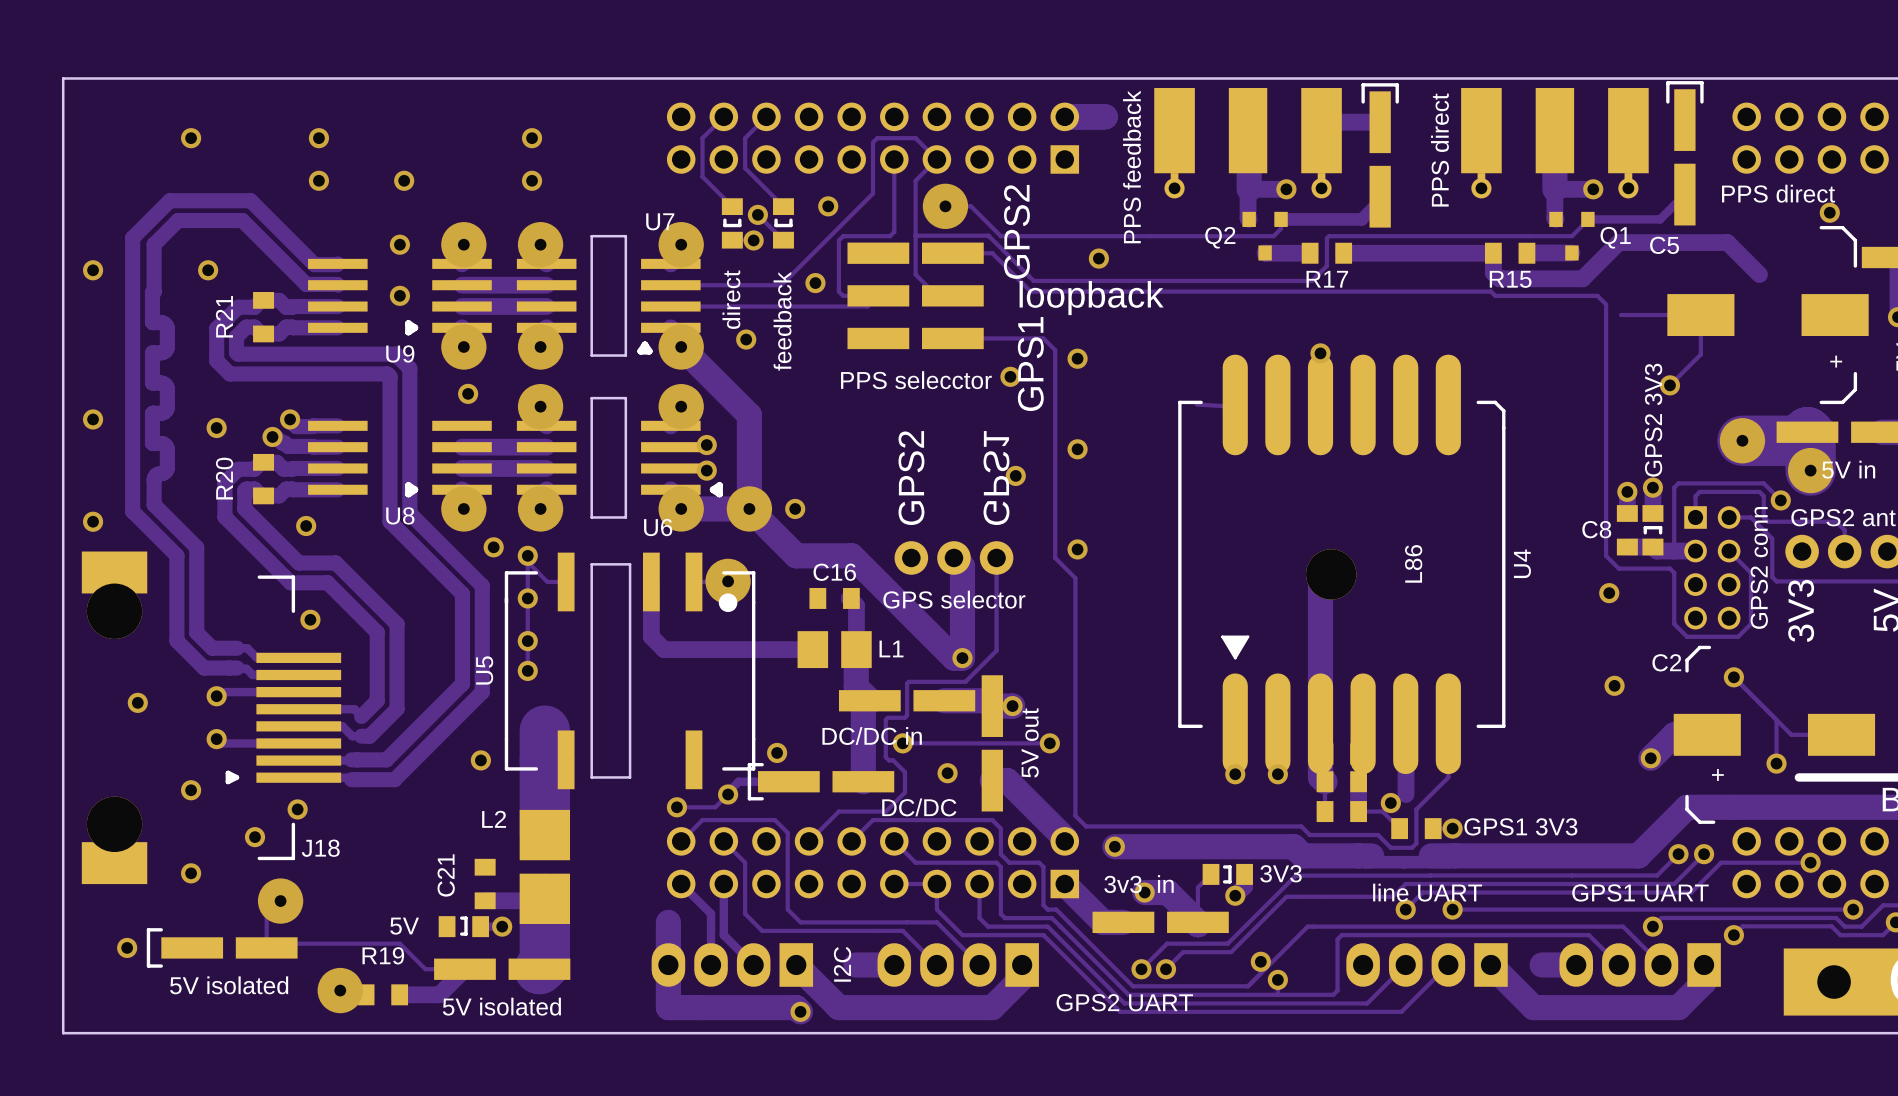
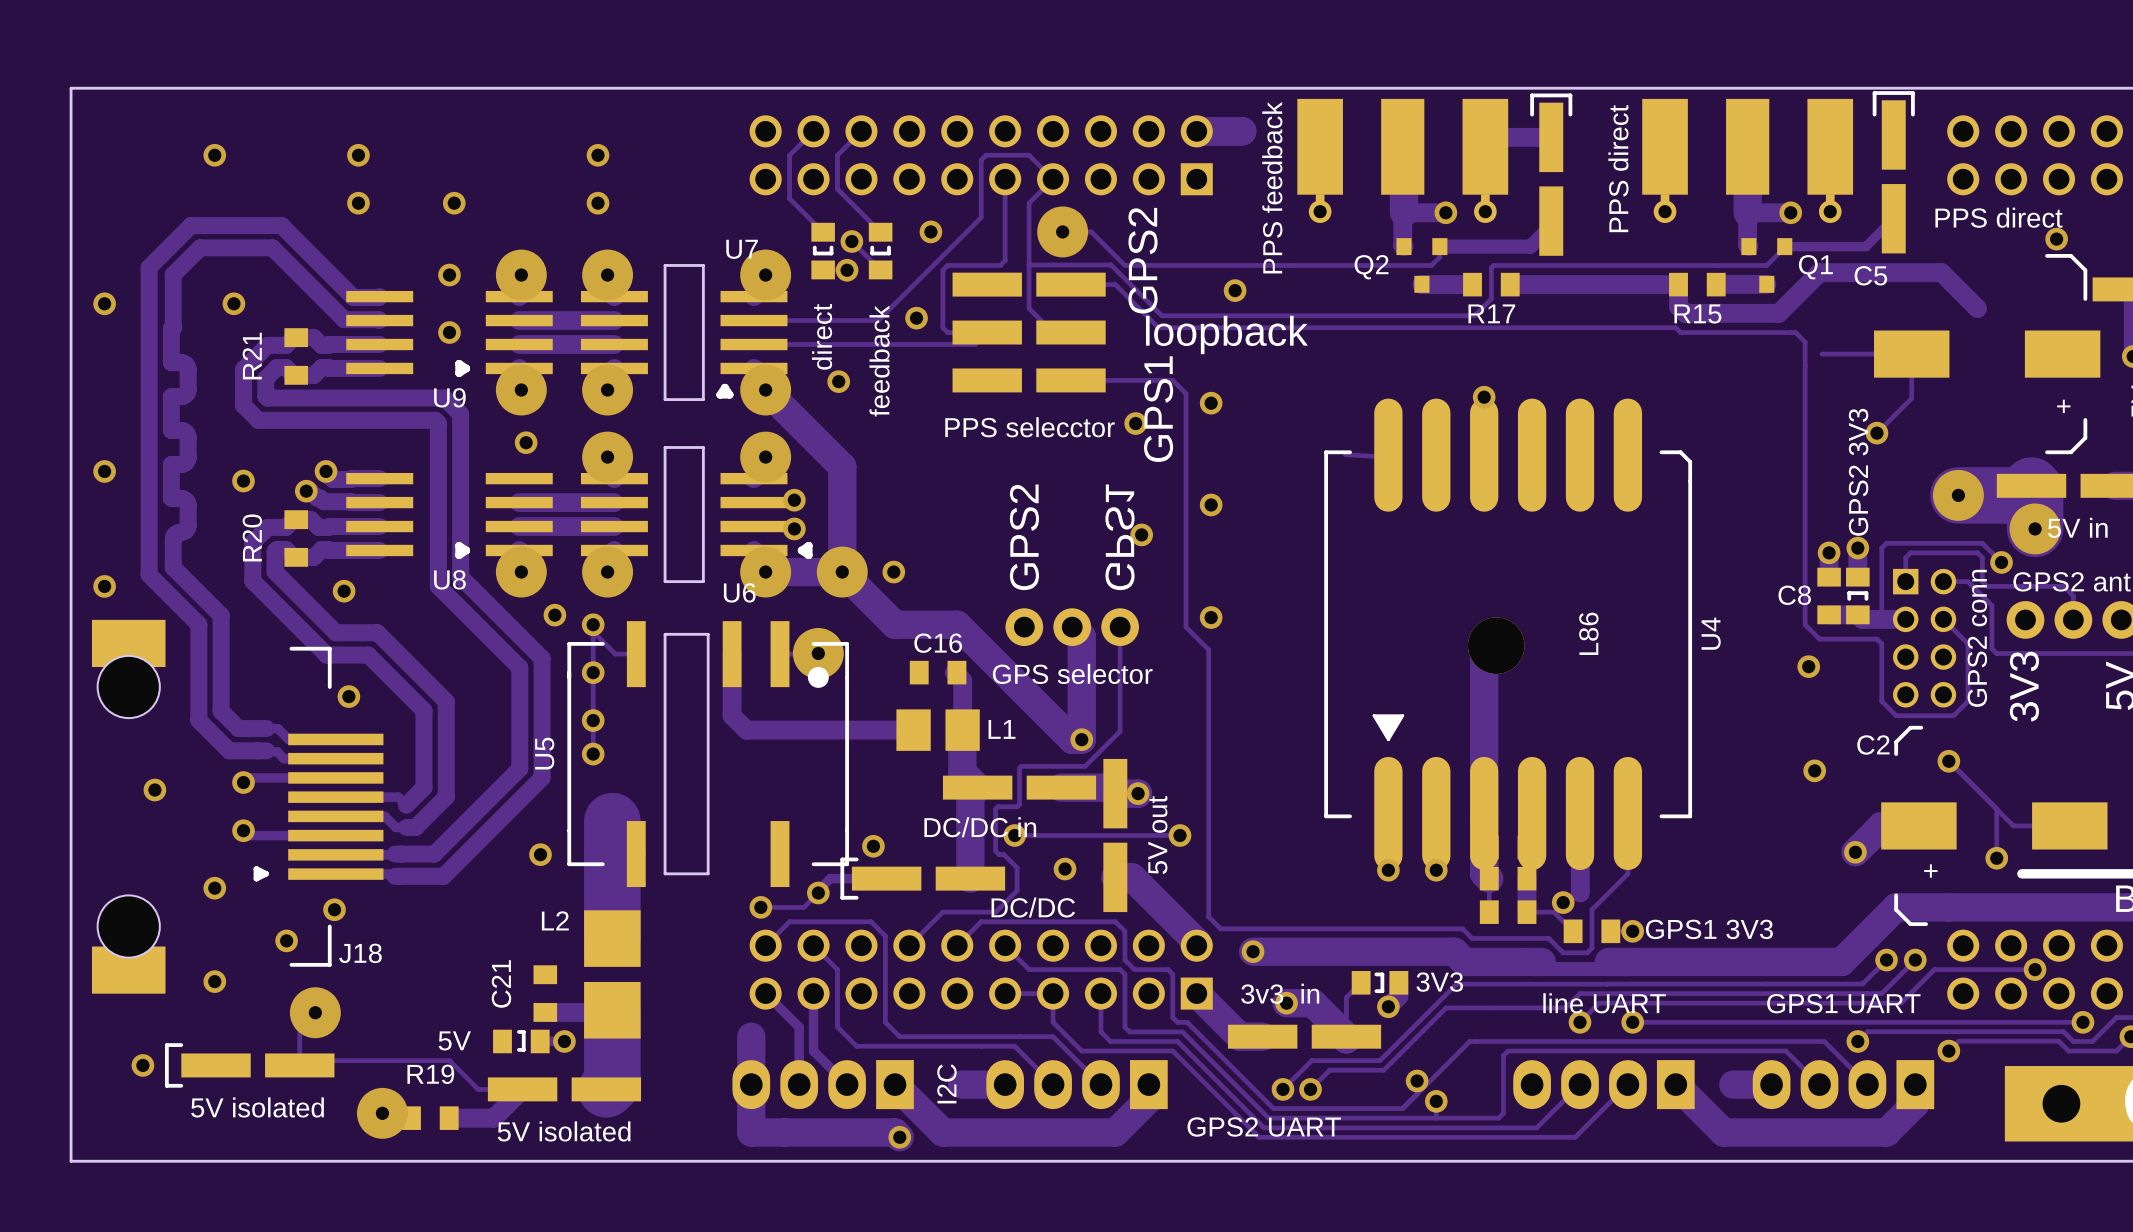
J18 footprint: [81, 551, 342, 885] -> [91, 619, 384, 994]

